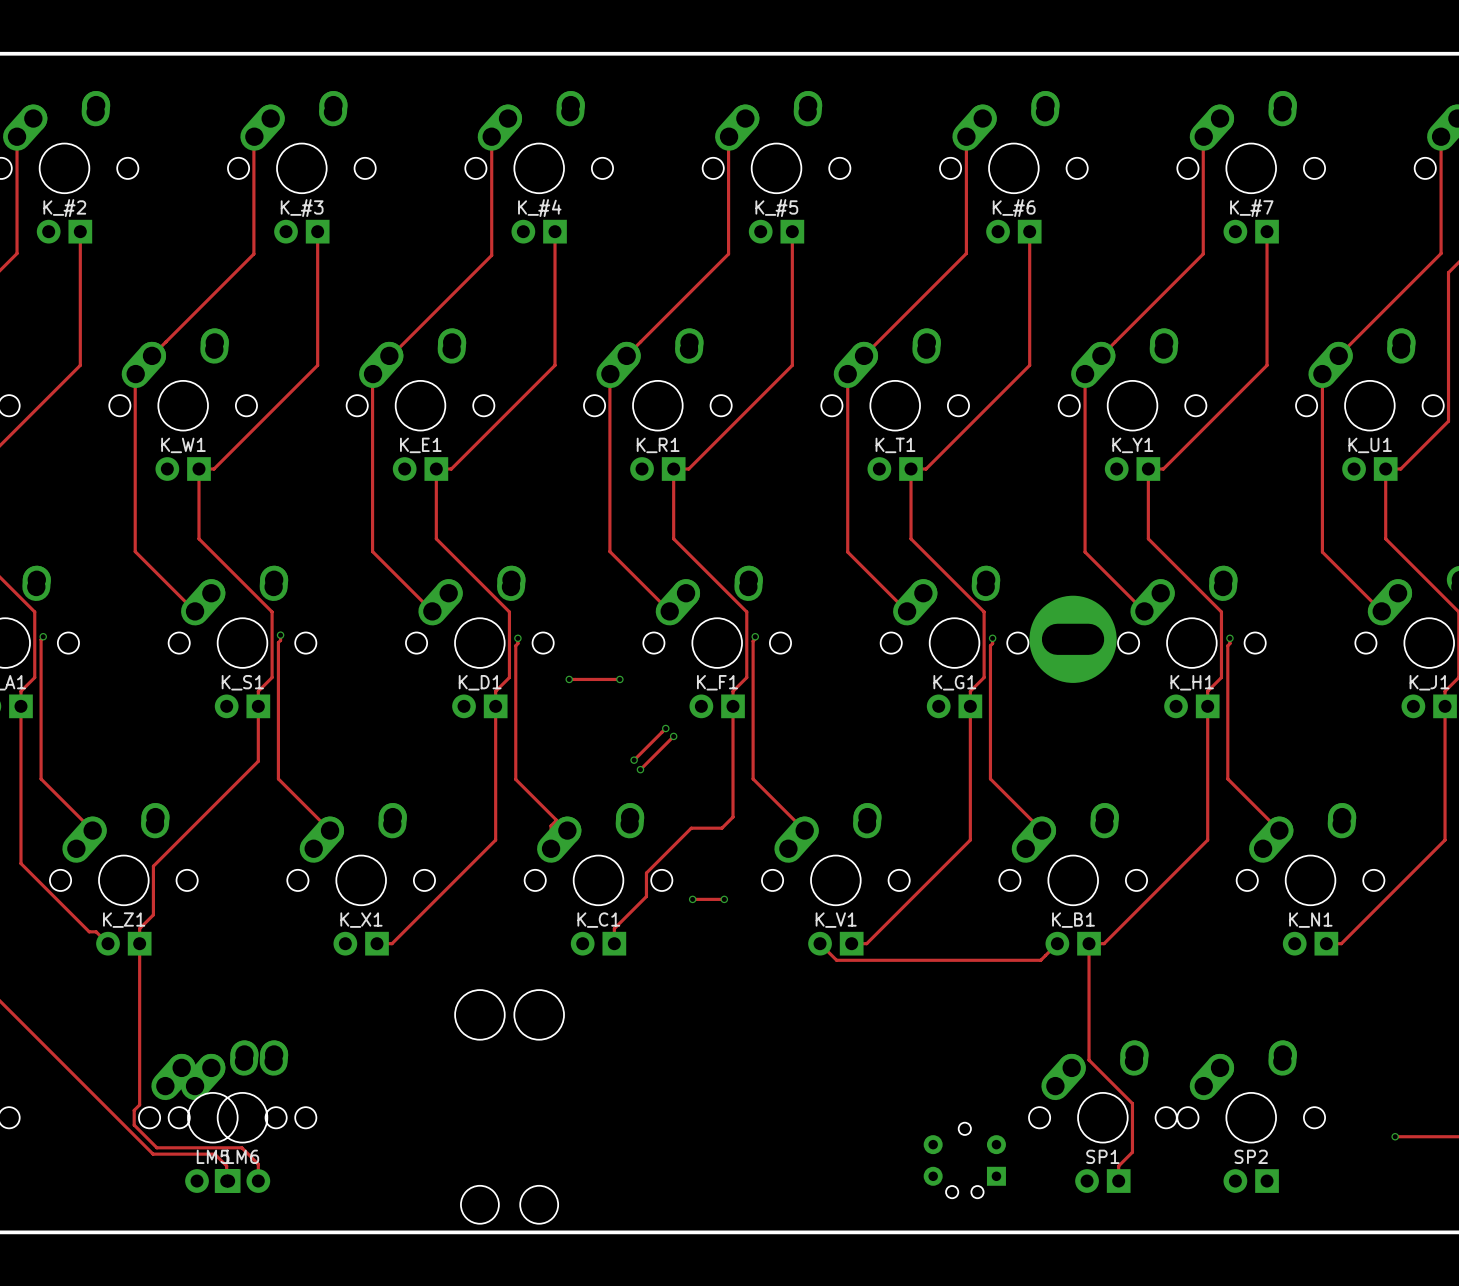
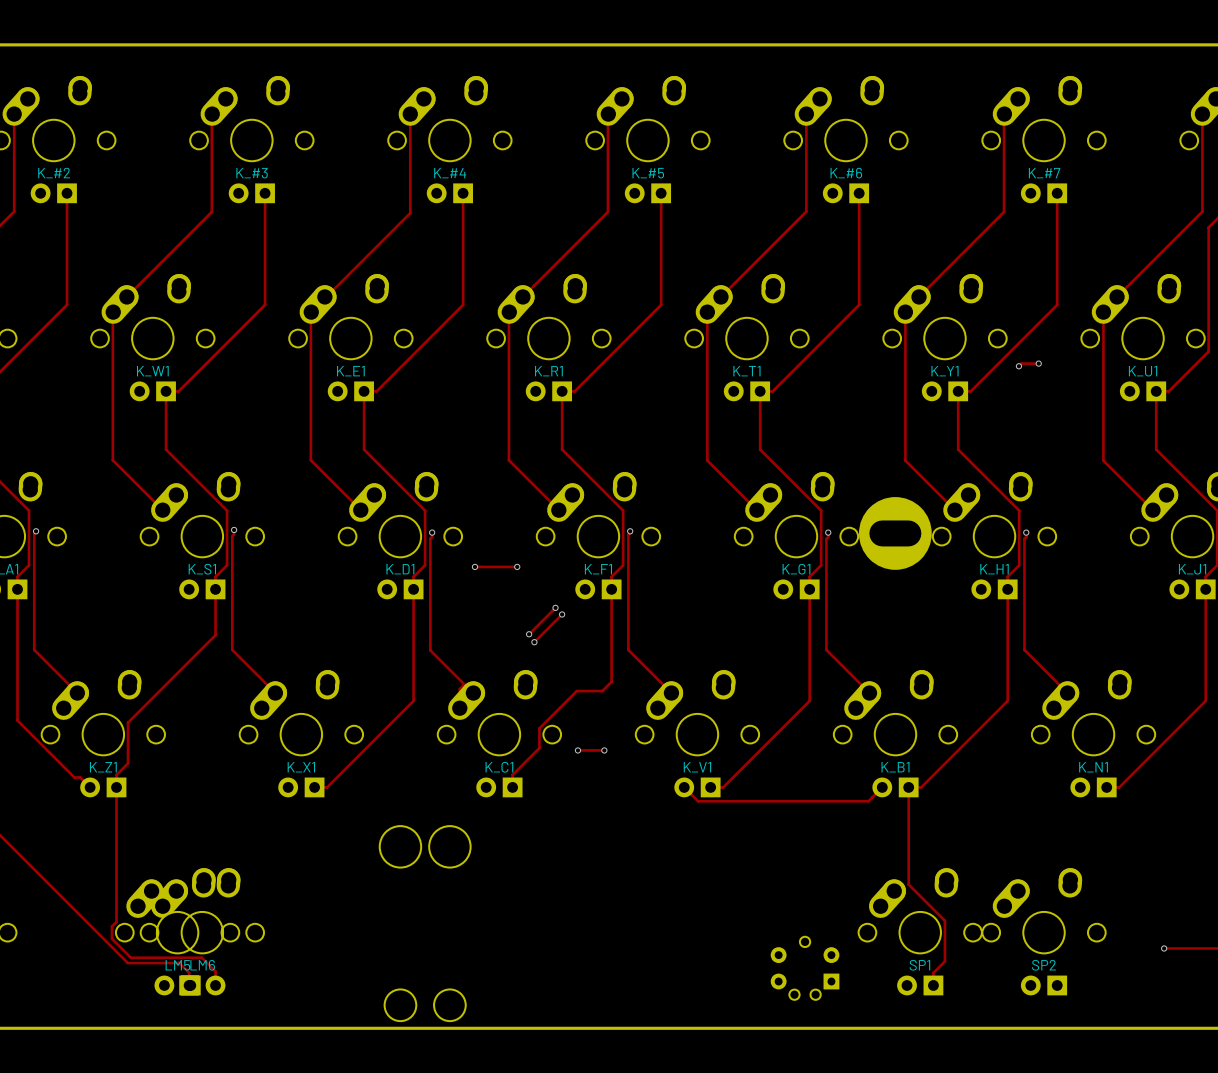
track: none -> (1038, 363) (1021, 363) (1018, 366)
via: none -> (1038, 363)
via: none -> (1018, 366)

